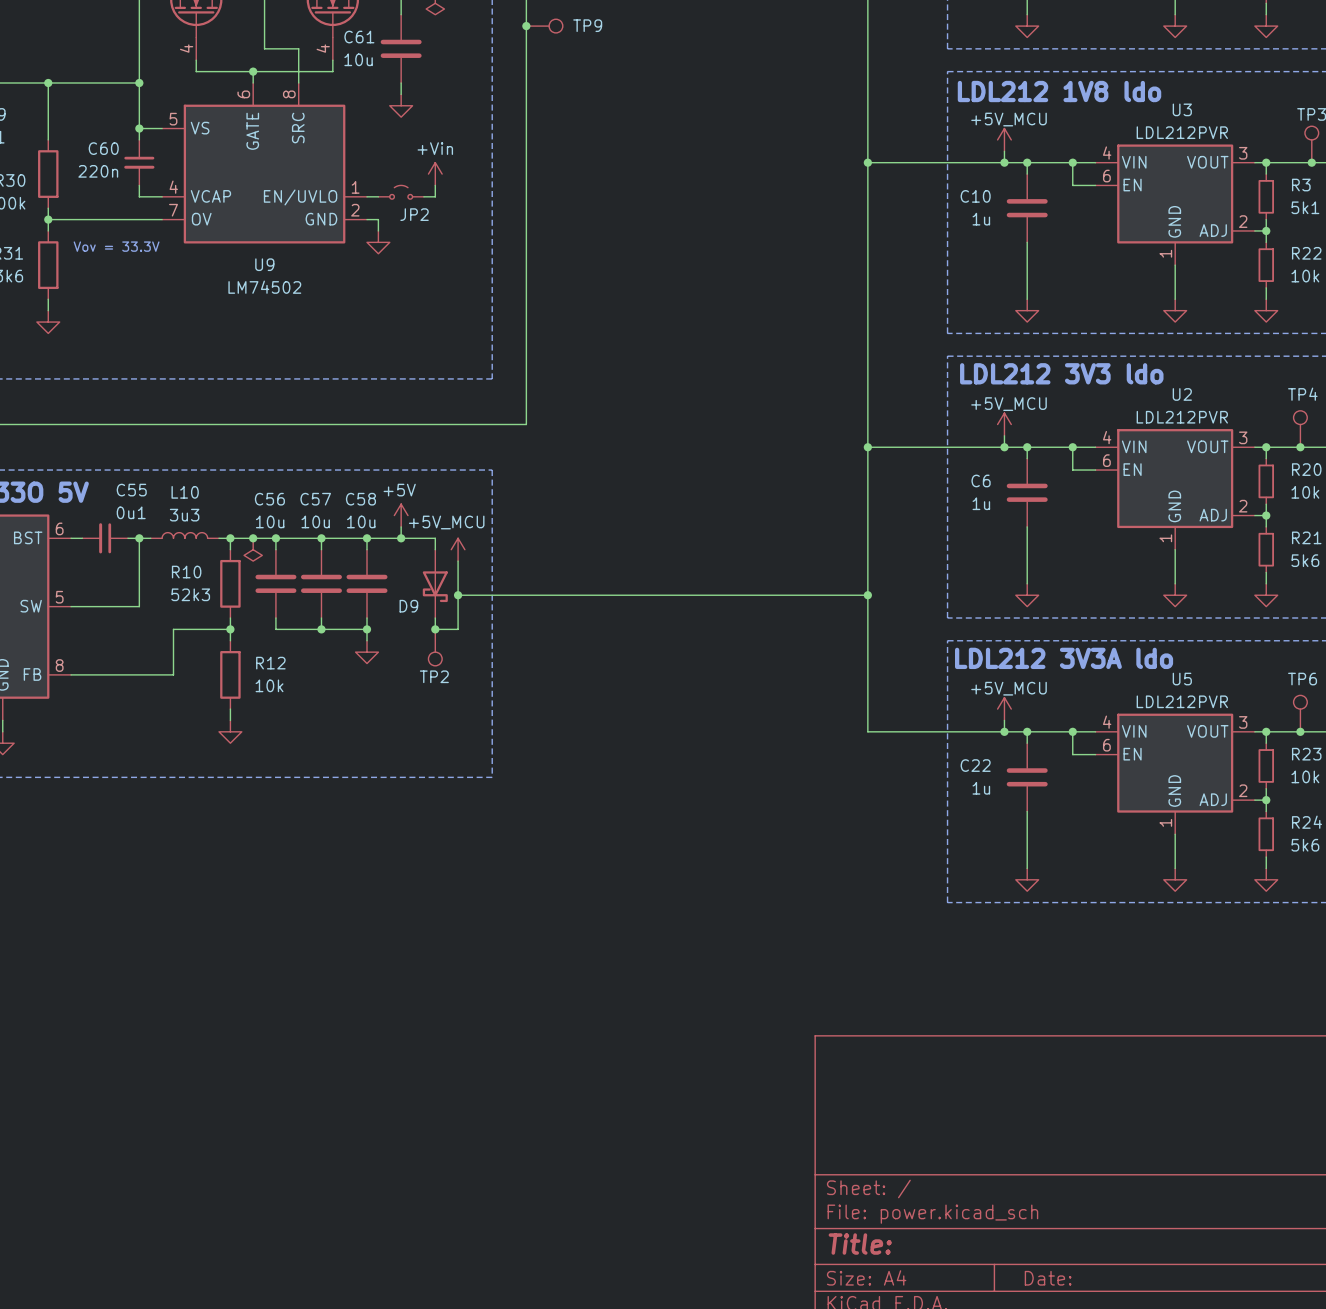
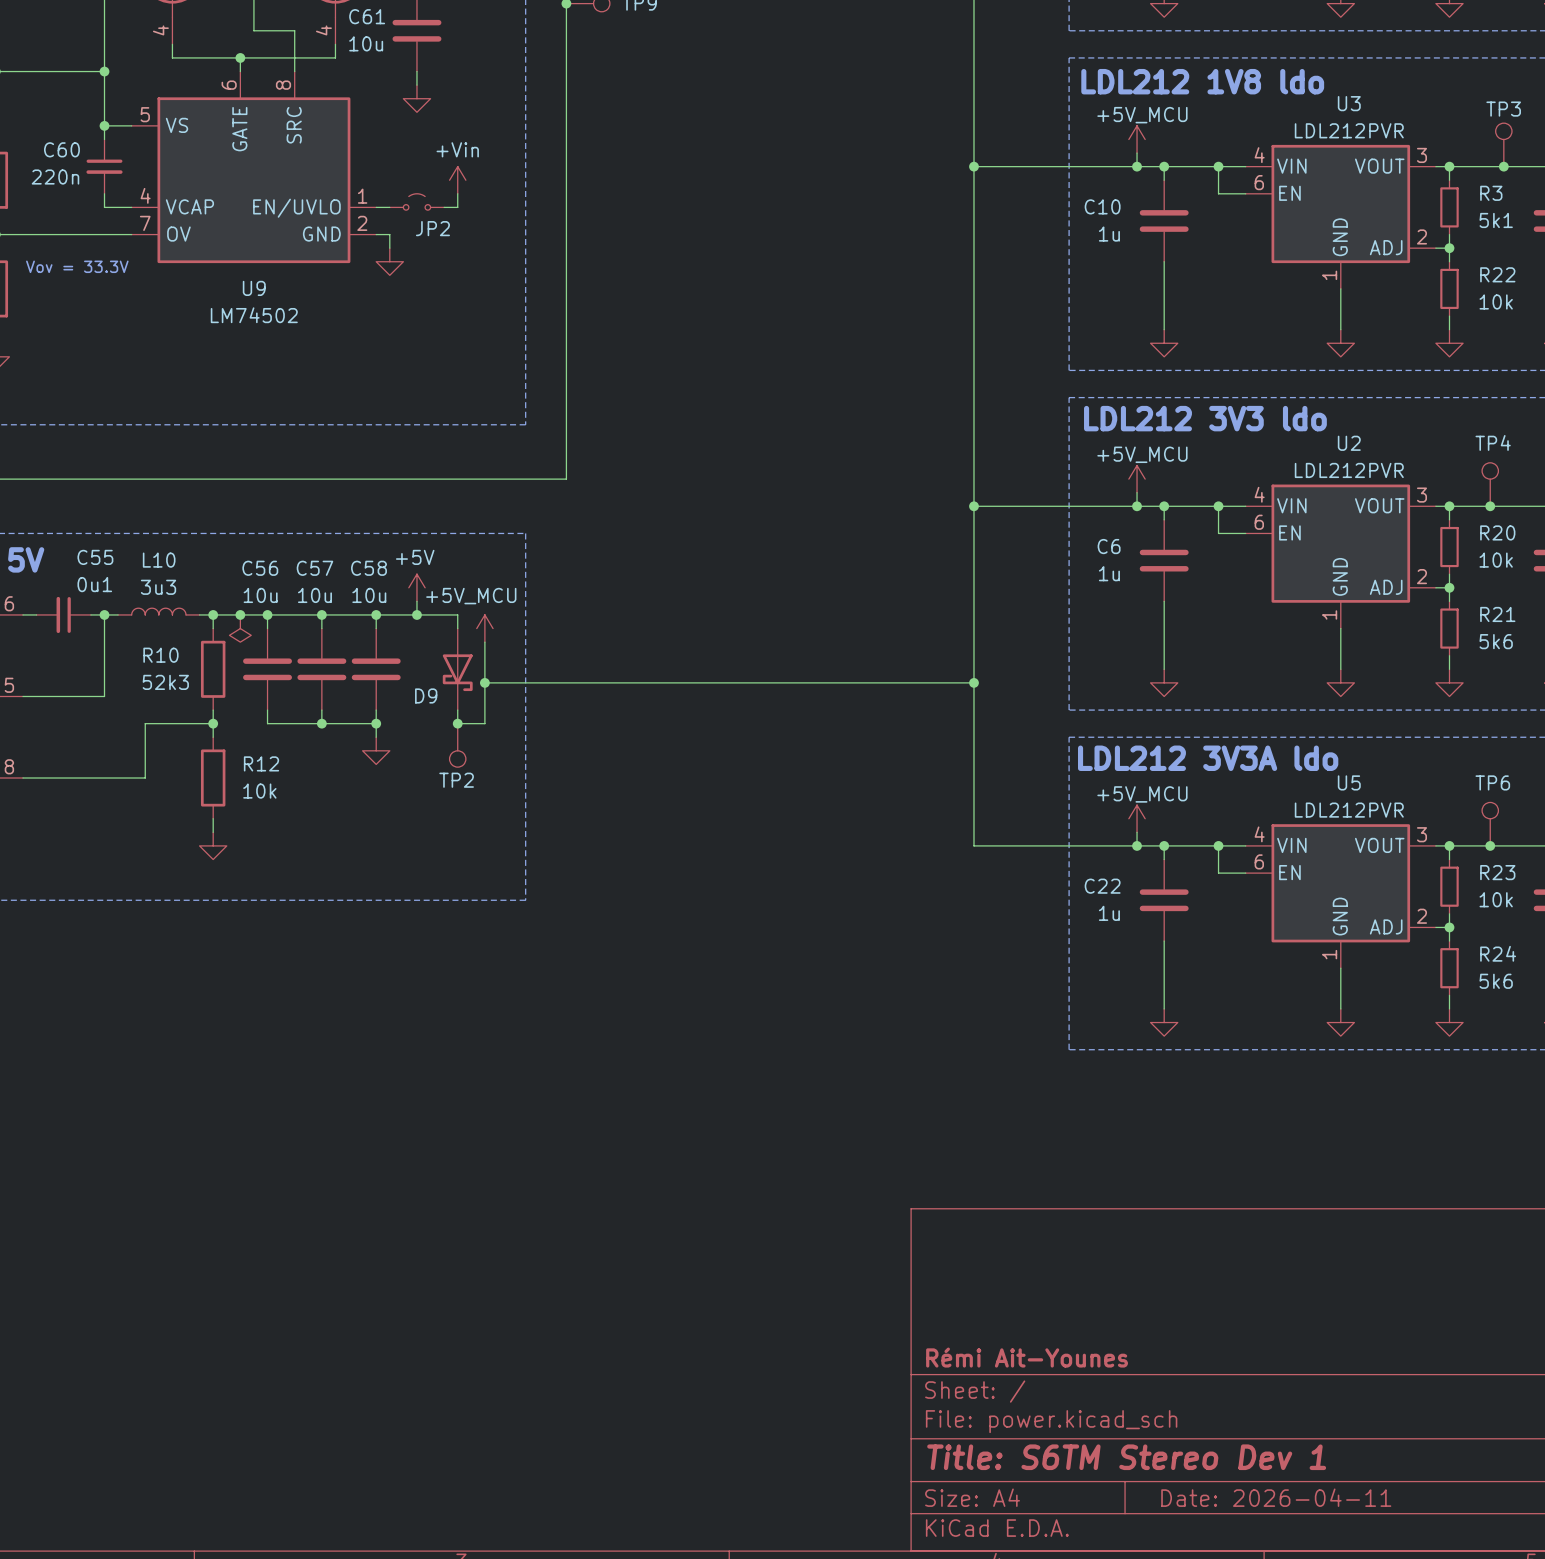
title block: none -> Rémi Ait-Younes (1027, 1357)
title block: Title: (860, 1244) -> Title: S6TM Stereo Dev 1 (1126, 1457)
title block: Date: (1048, 1278) -> Date: 2026-04-11 (1276, 1497)

